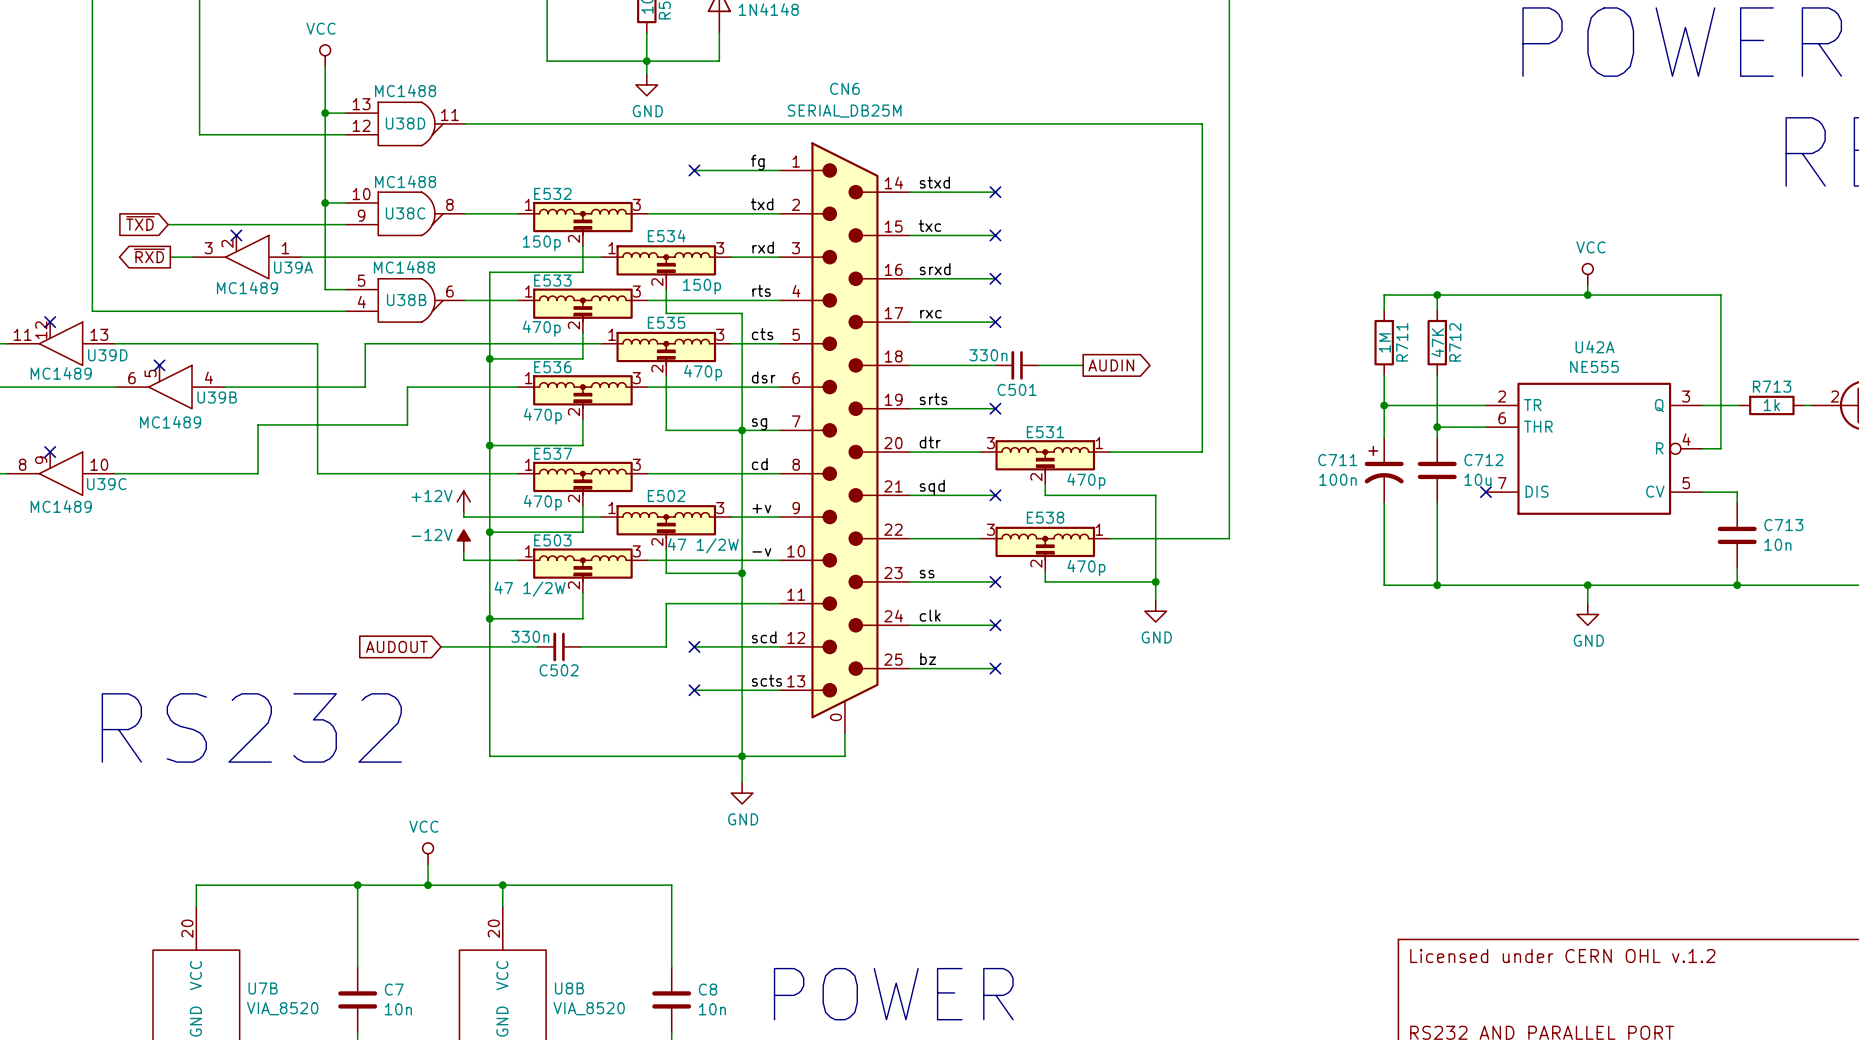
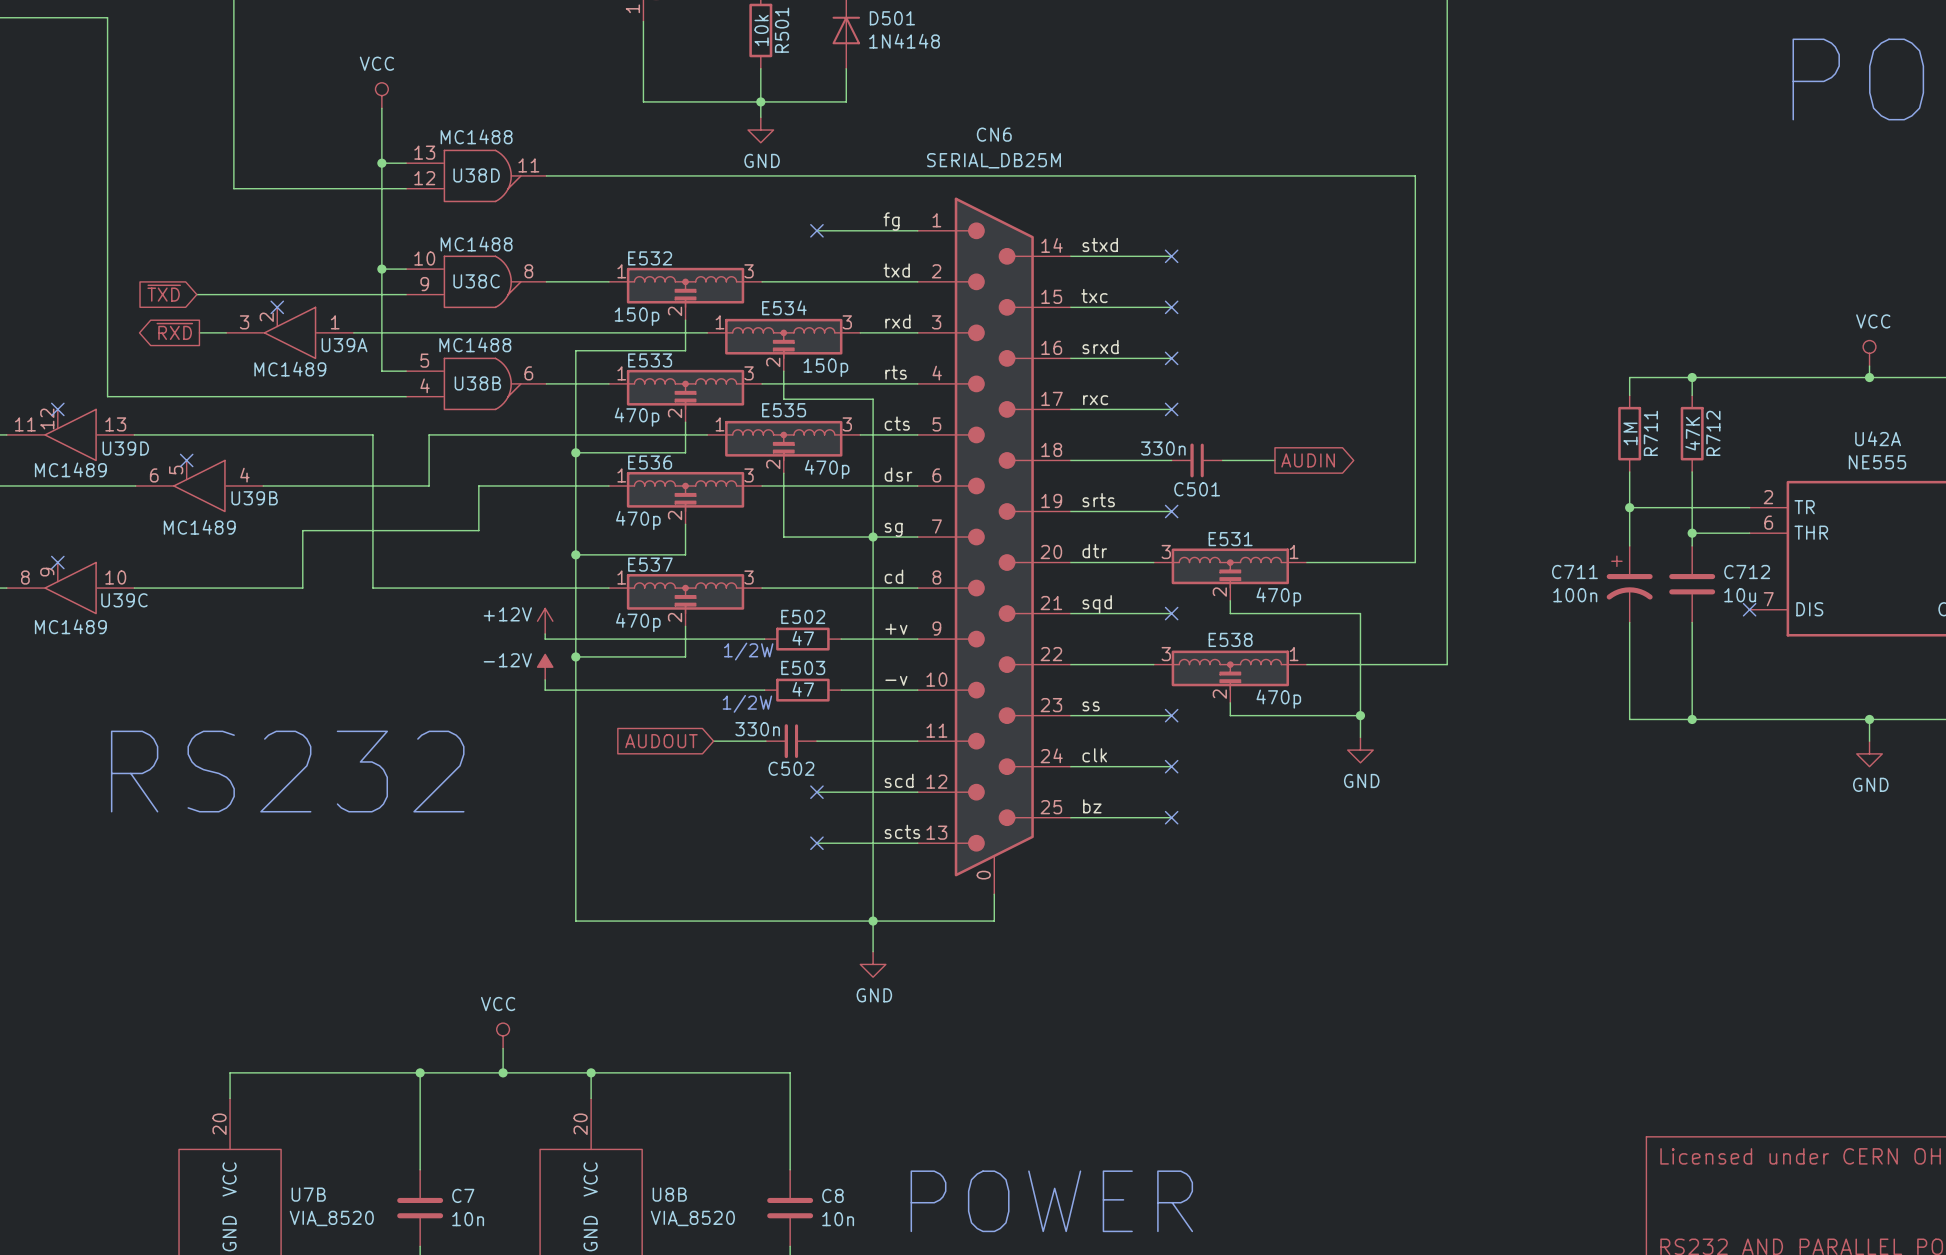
E502 symbol: [601, 505, 732, 550] -> [764, 627, 842, 651]
text: none -> 1/2W (748, 651)
E503 name position: E503 (552, 540) -> E503 (803, 667)
E502 value: 47 1/2W (703, 545) -> 47 (803, 638)
E503 symbol: [517, 548, 648, 593] -> [764, 678, 842, 702]
wire: (666, 549) (666, 573) (742, 573) -> none
wire: (650, 560) (715, 560) -> none
text: none -> 1/2W (747, 703)
junction: (742, 573) -> none
E503 value: 47 1/2W (530, 589) -> 47 (803, 689)
wire: (582, 592) (582, 618) (489, 618) -> none
wire: none -> (713, 741) (765, 741)
wire: (694, 603) (666, 603) (666, 646) (580, 646) -> none
junction: (489, 618) -> none
global label position: AUDOUT (396, 646) -> AUDOUT (661, 741)
wire: (441, 646) (537, 646) -> none
C502 position: (559, 646) -> (791, 741)
text position: RS232 (251, 727) -> RS232 (287, 771)

